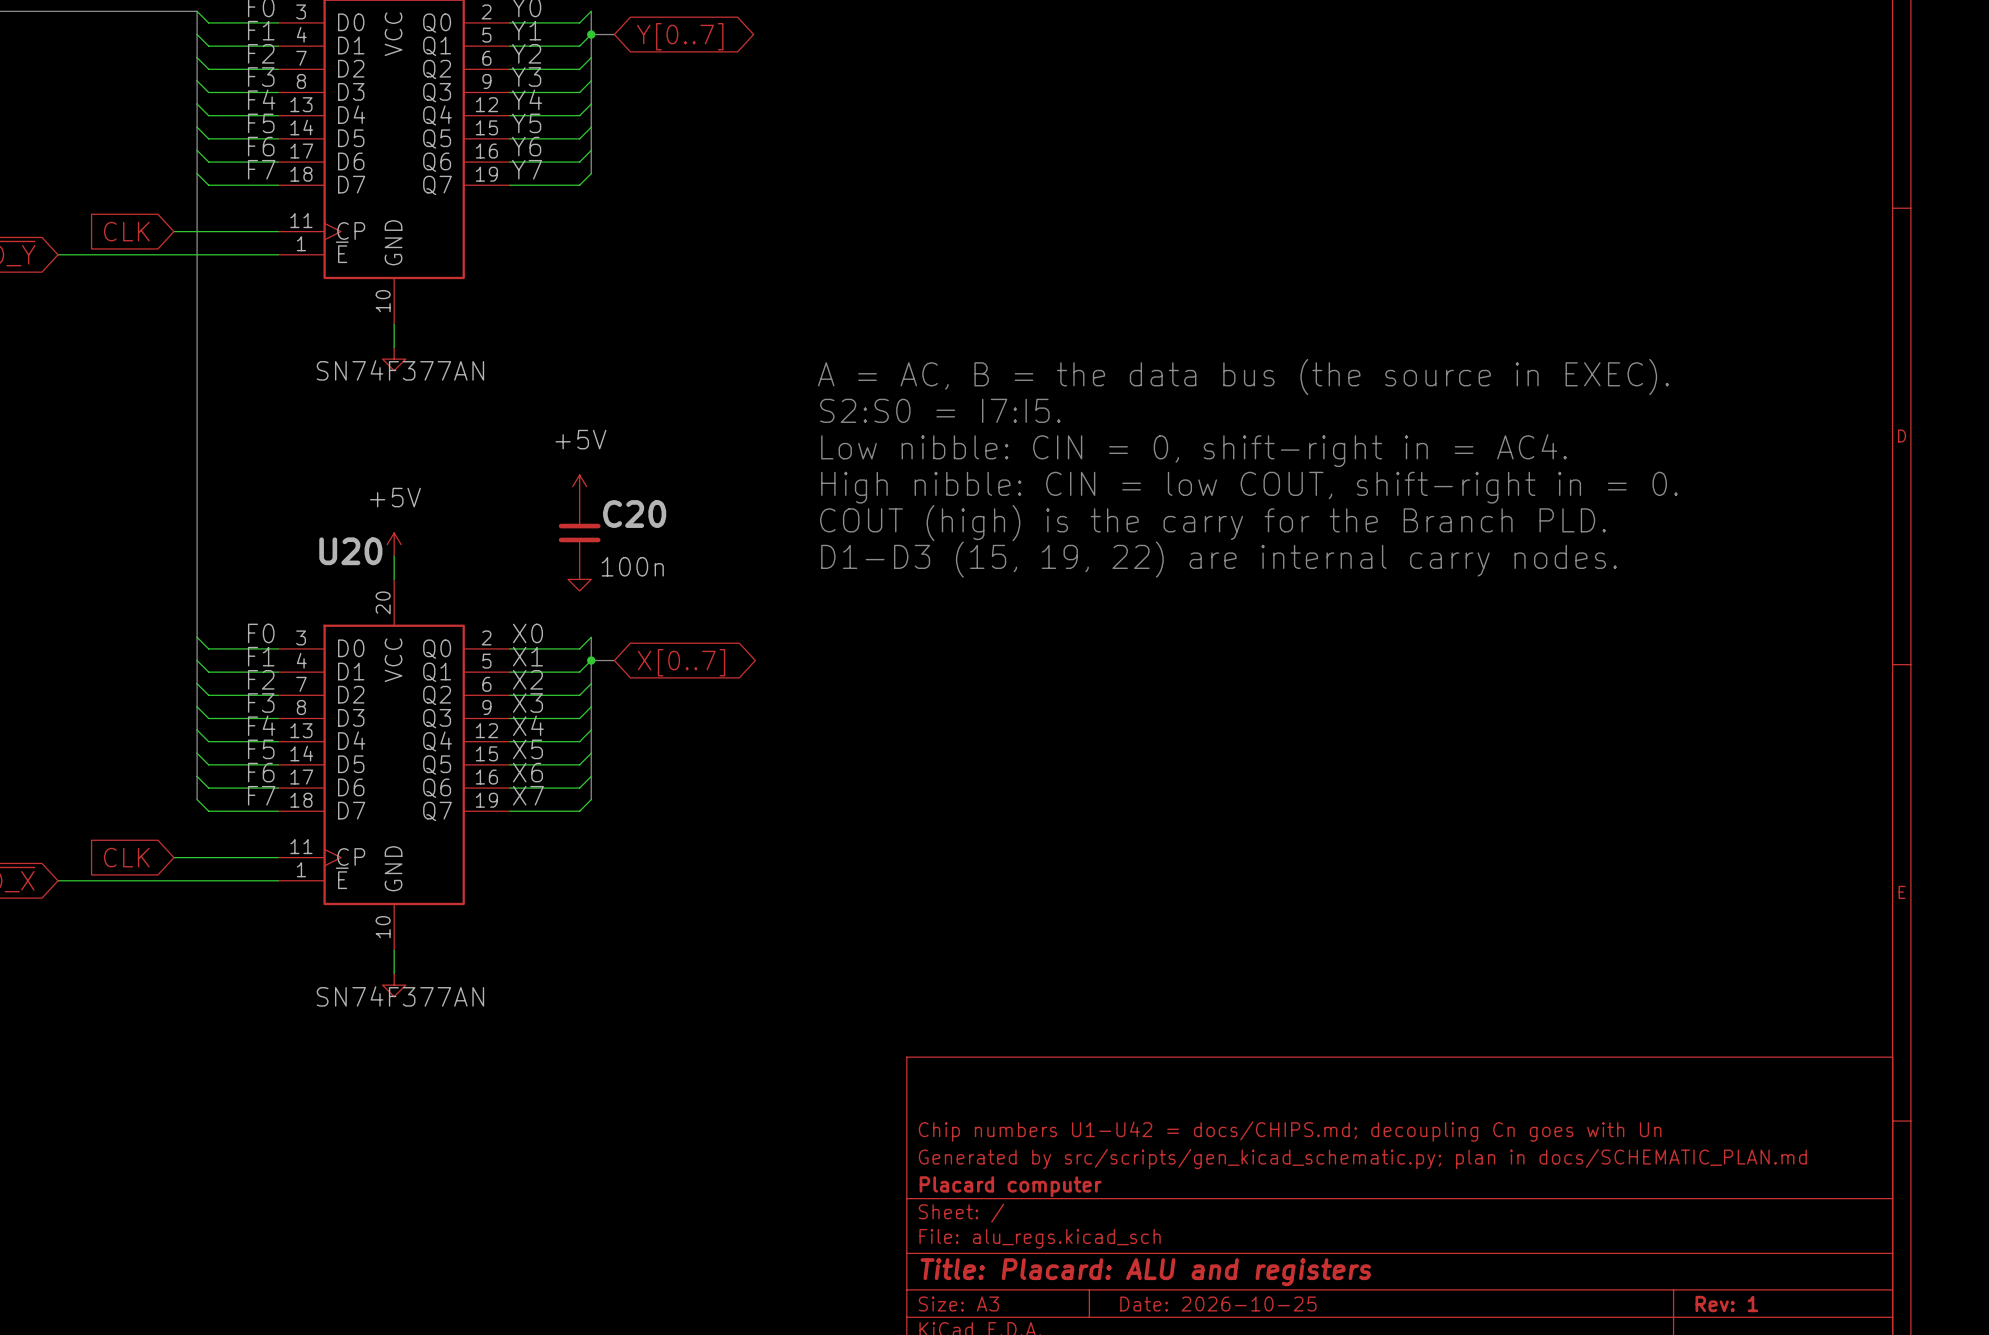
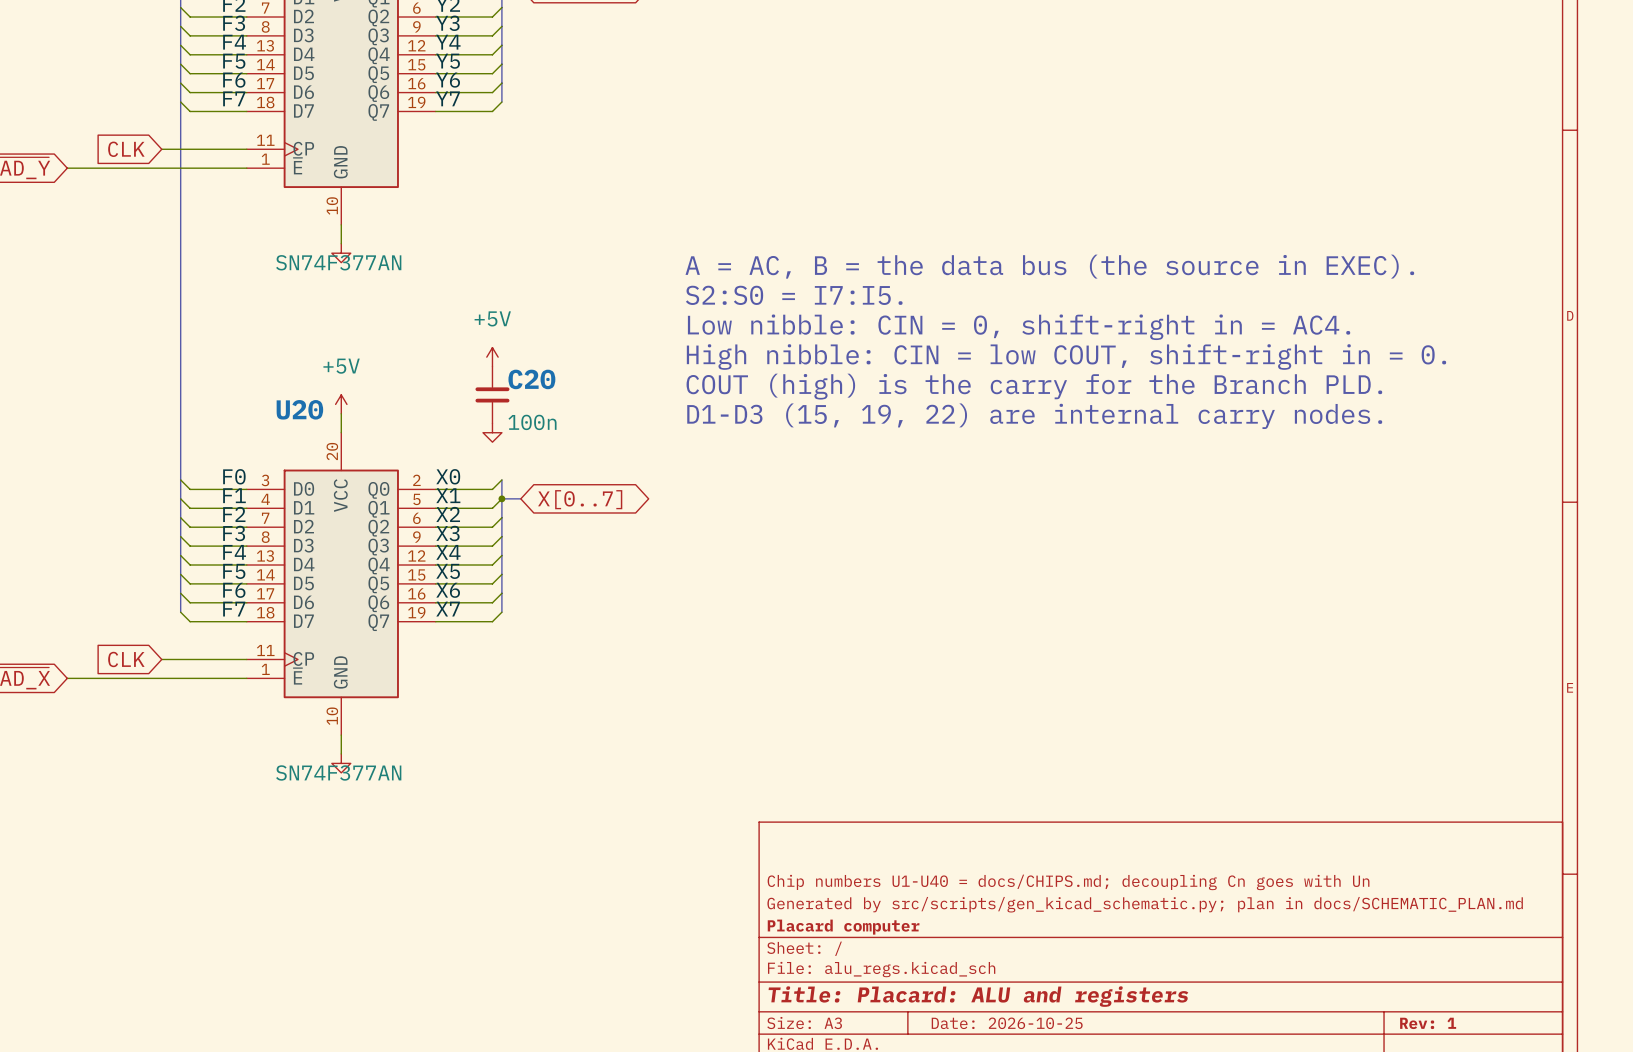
title block: Chip numbers U1-U42 = docs/CHIPS.md; decoupling Cn goes with Un (1290, 1131) -> Chip numbers U1-U40 = docs/CHIPS.md; decoupling Cn goes with Un (1068, 882)

